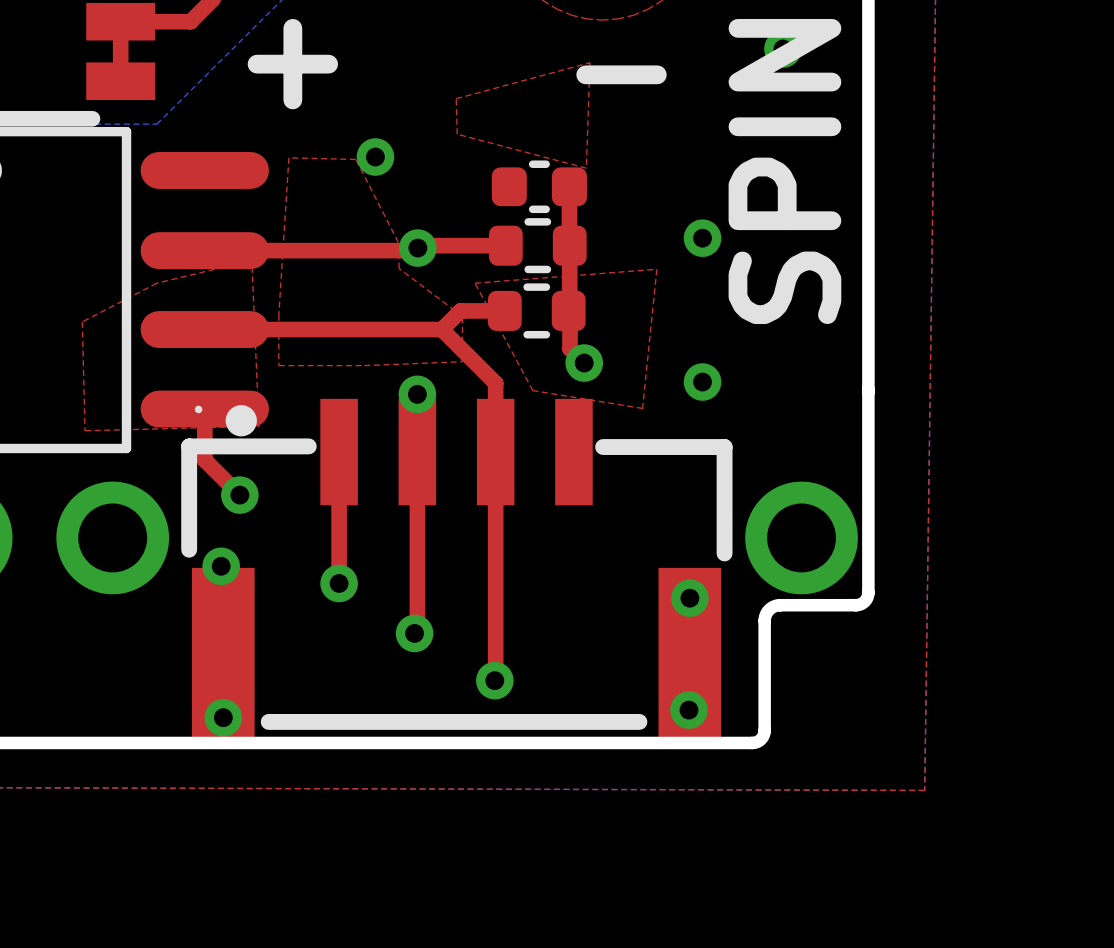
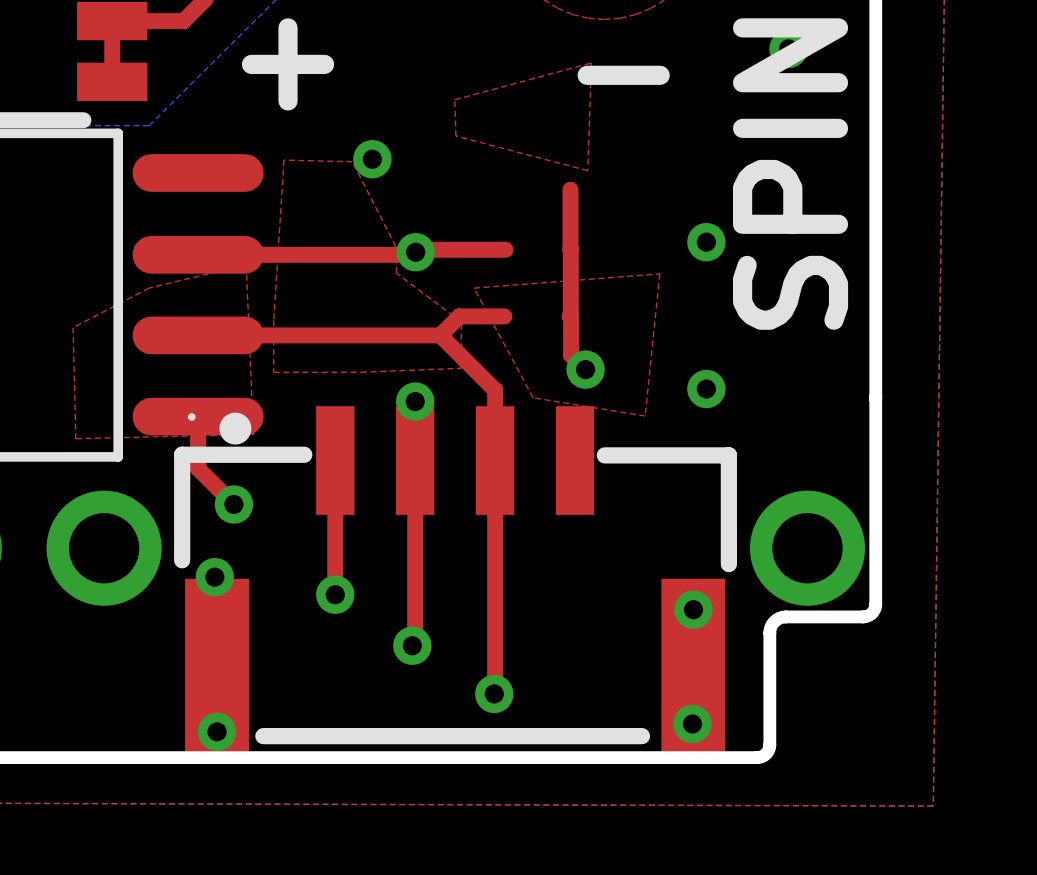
part: (539, 186) -> none
part: (537, 245) -> none
part: (536, 310) -> none

